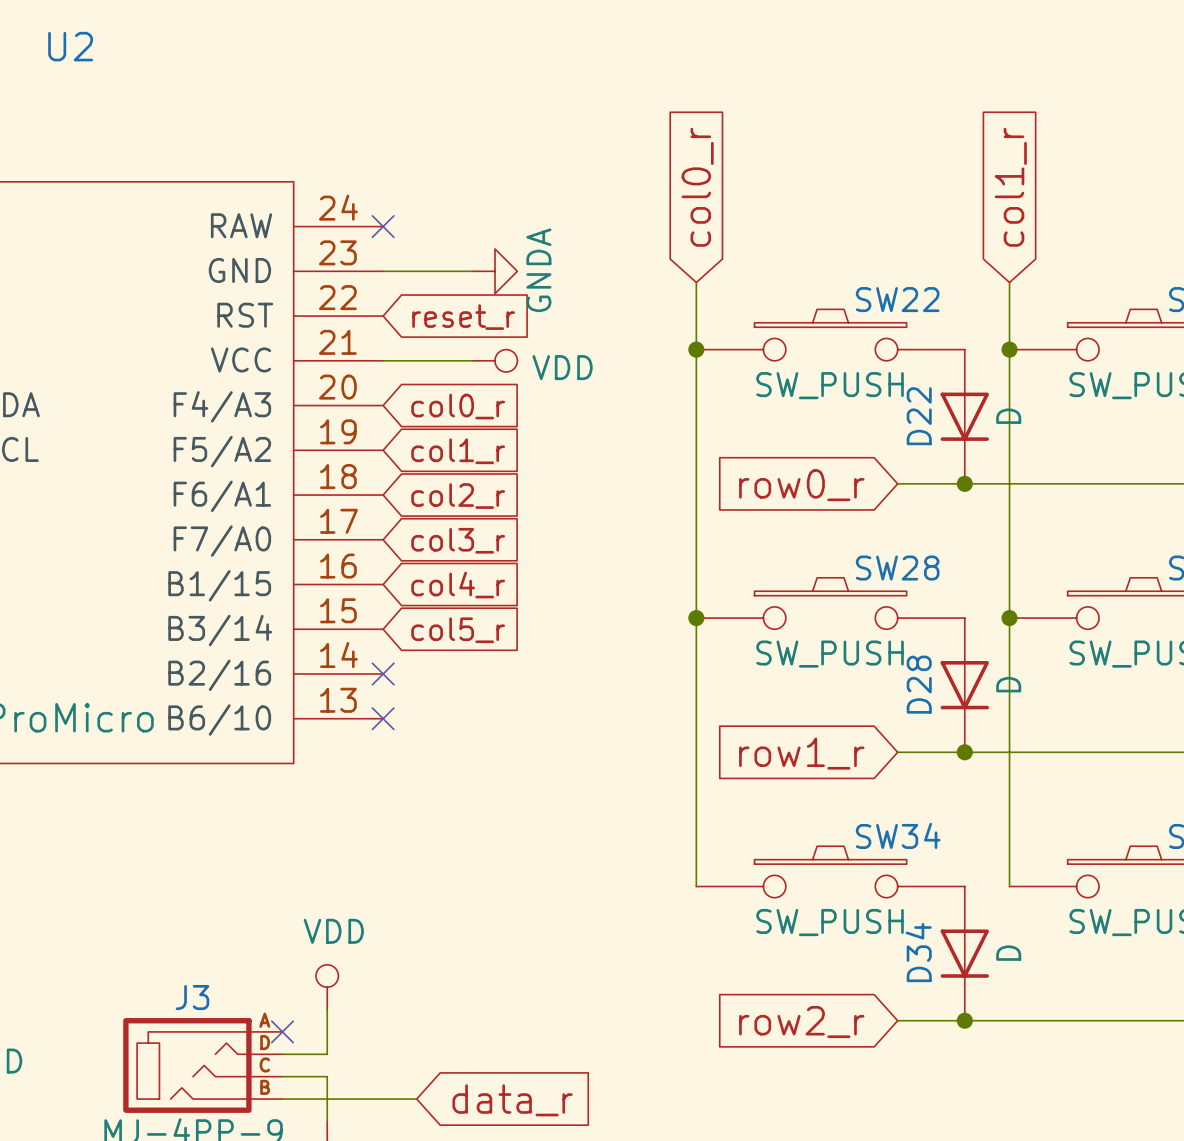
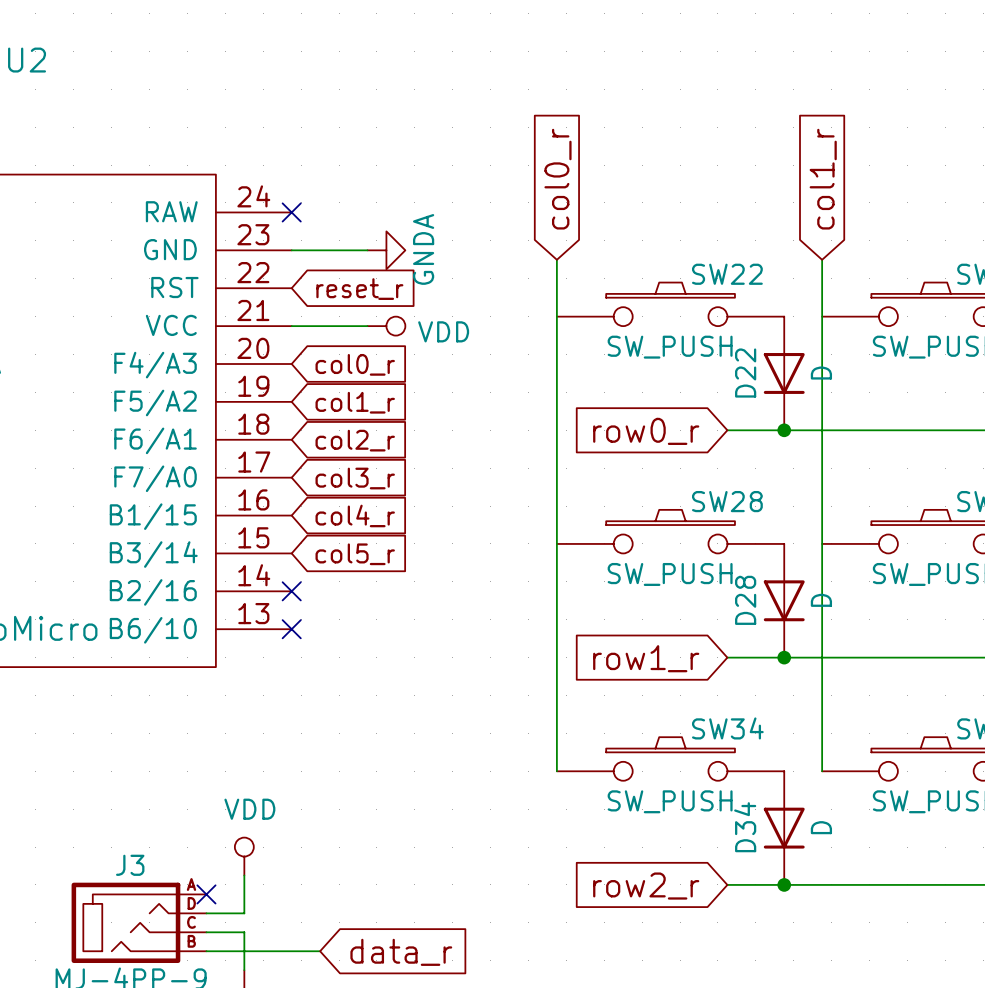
junction: (696, 349) -> none
junction: (1009, 349) -> none
junction: (696, 618) -> none
junction: (1009, 618) -> none

